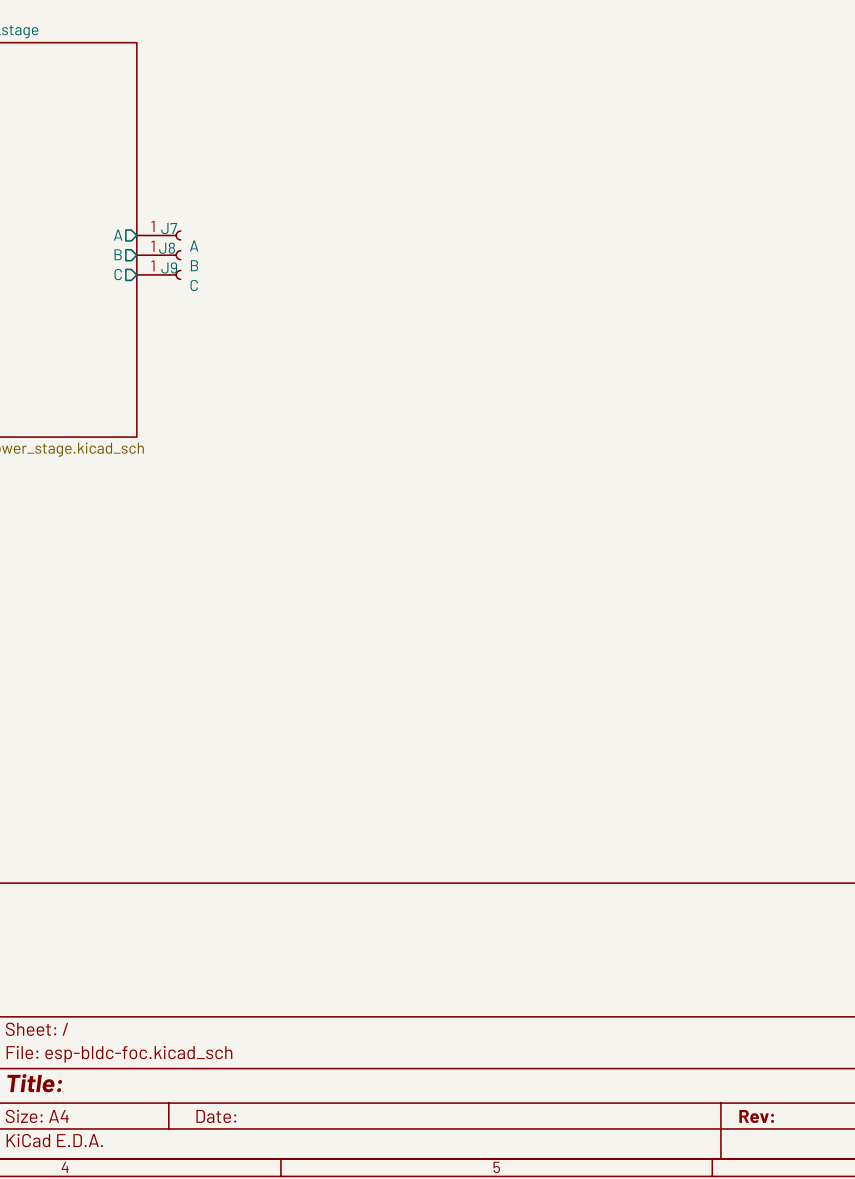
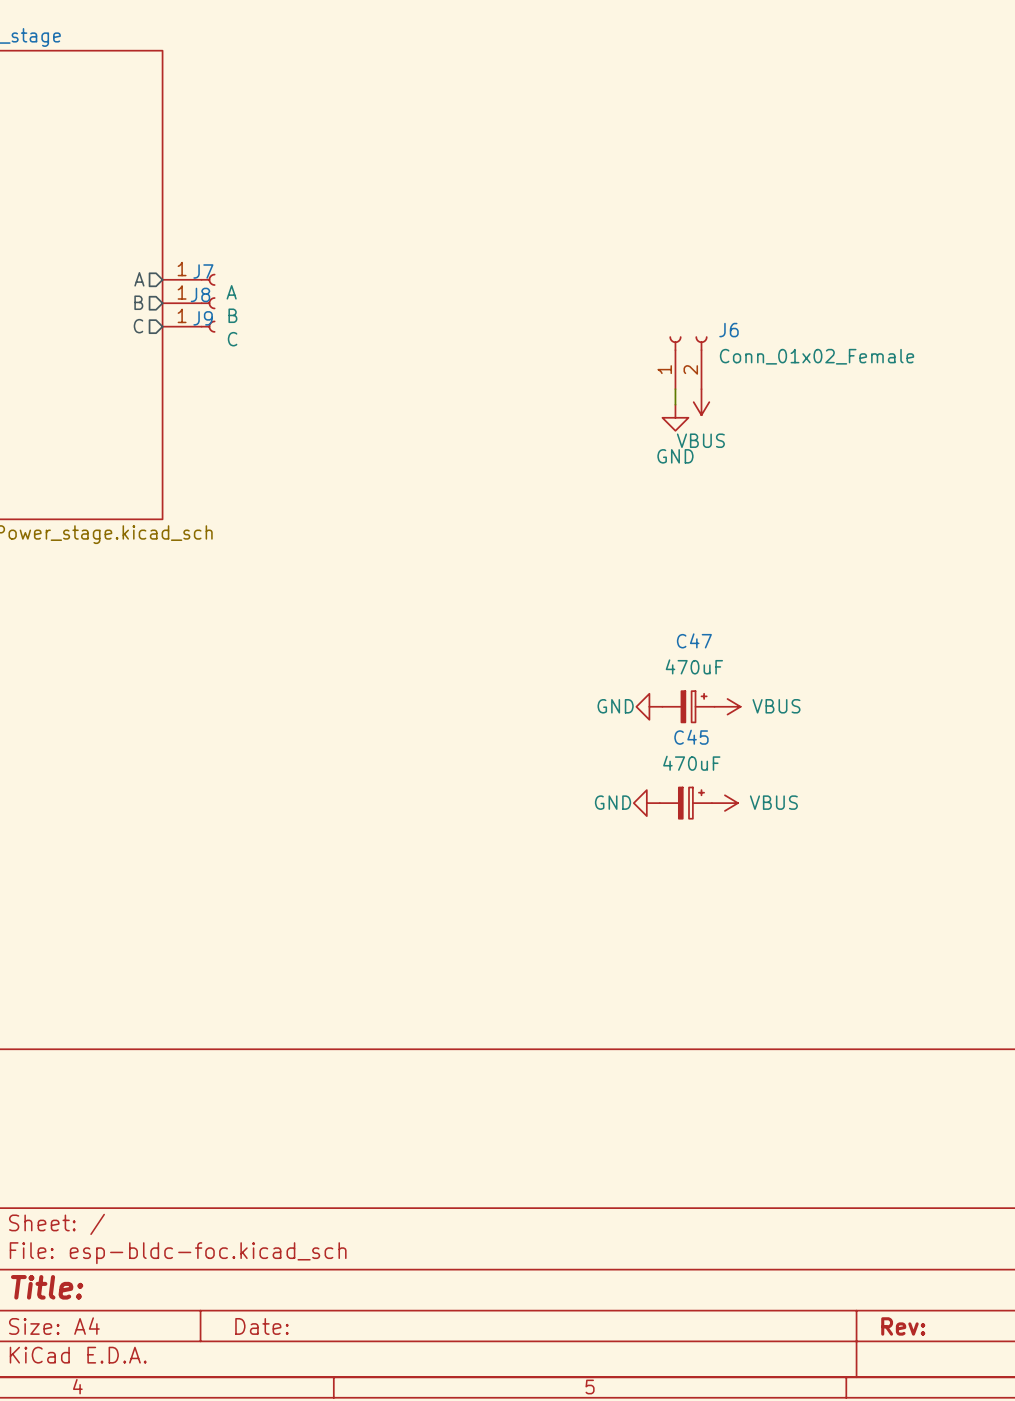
J6: none -> Conn_01x02_Female (688, 362)
wire: none -> (675, 389) (675, 404)
power symbol: none -> VBUS (701, 402)
power symbol: none -> GND (675, 417)
power symbol: none -> GND (649, 706)
C47: none -> 470uF (688, 706)
power symbol: none -> VBUS (727, 706)
power symbol: none -> GND (646, 803)
C45: none -> 470uF (685, 803)
power symbol: none -> VBUS (724, 803)

